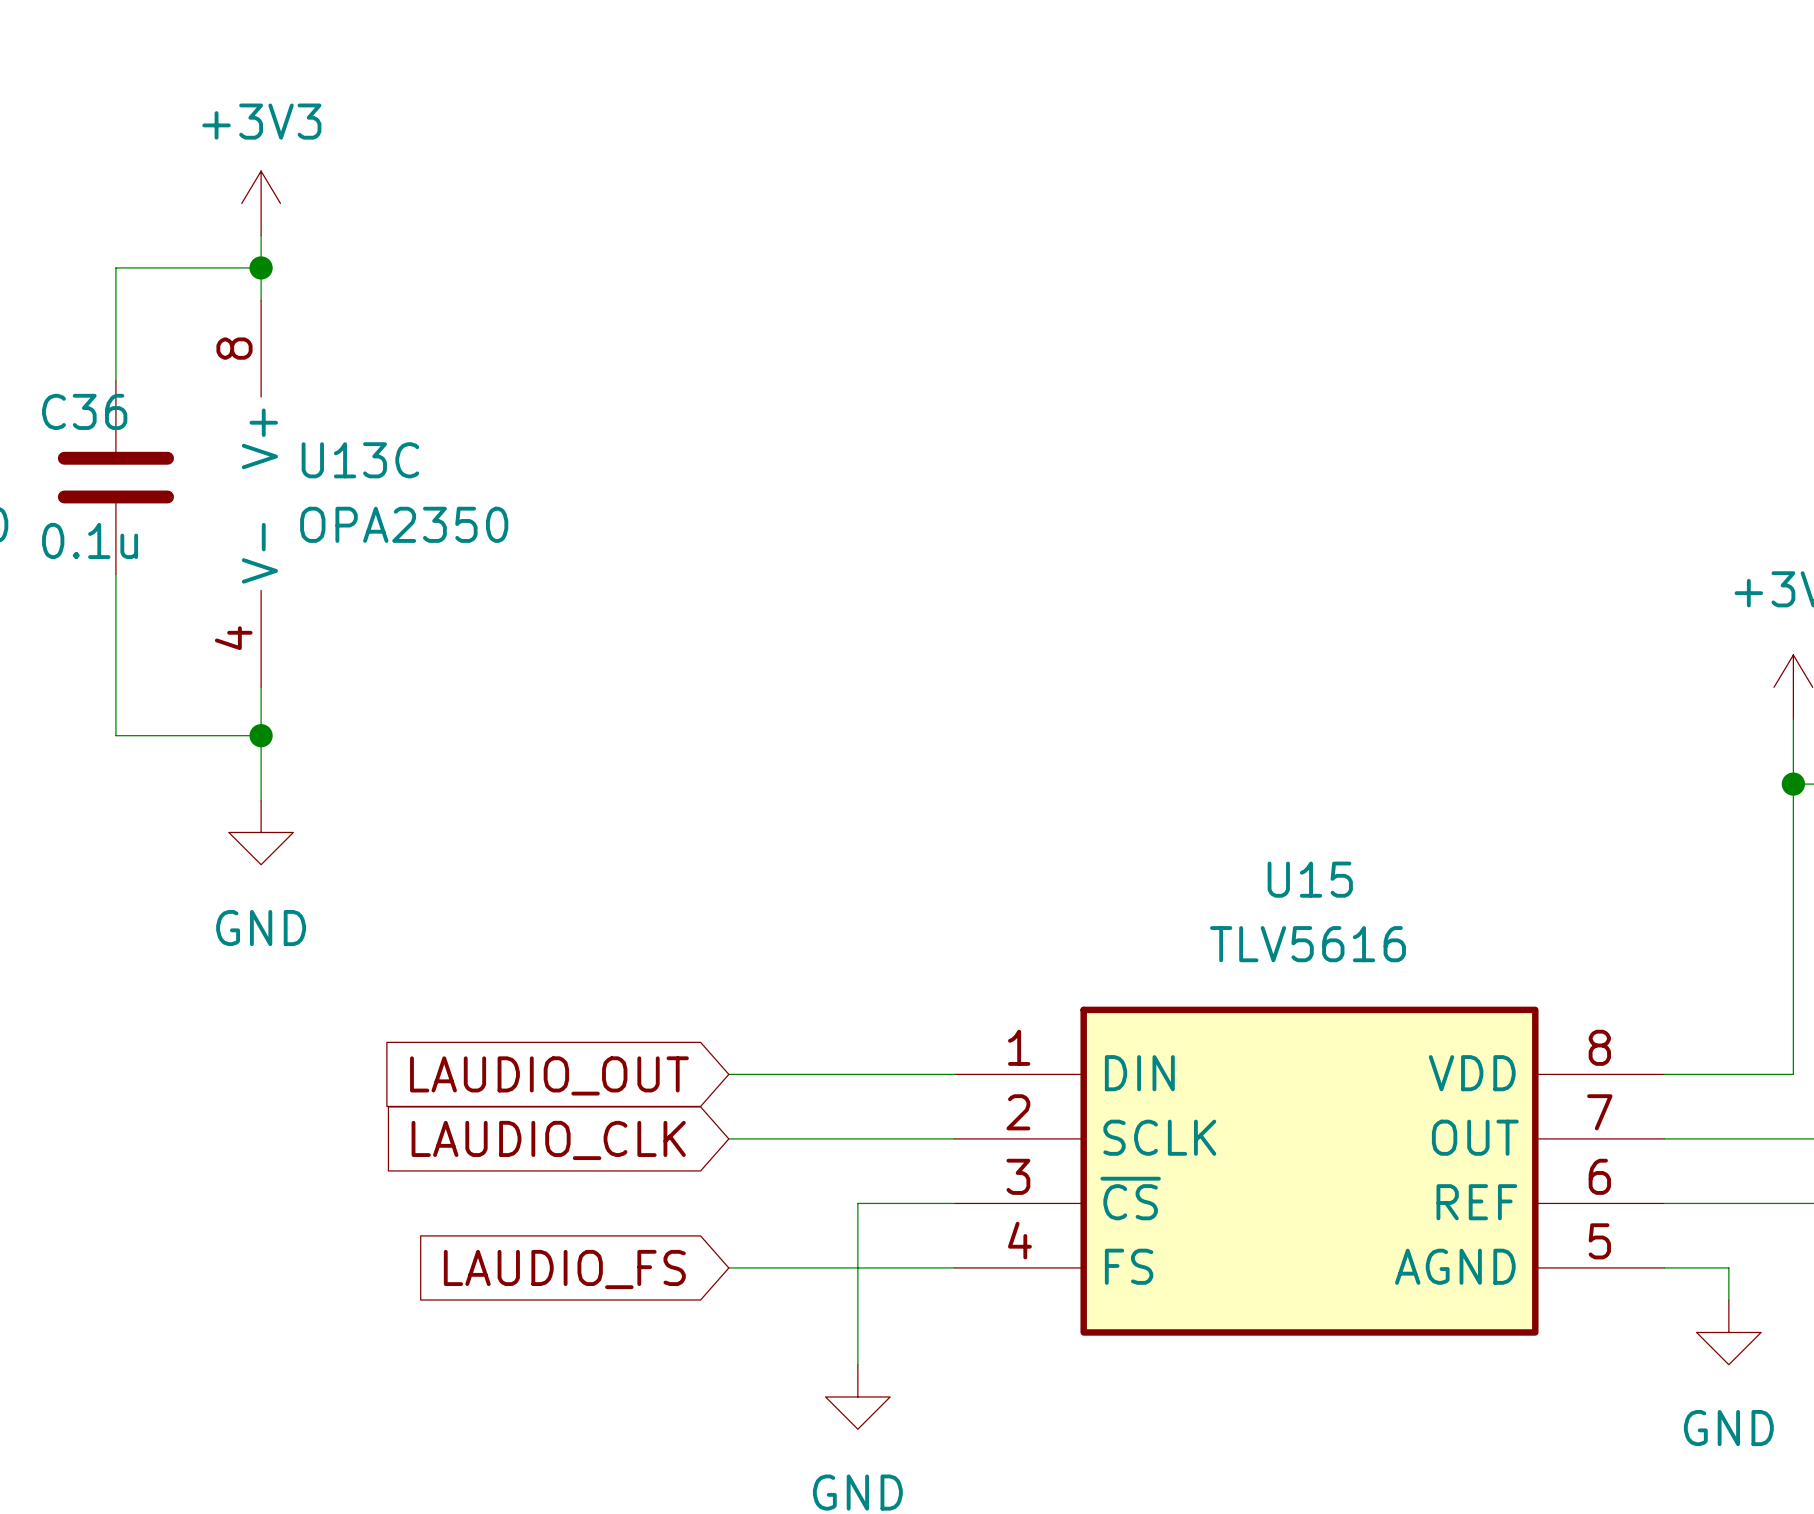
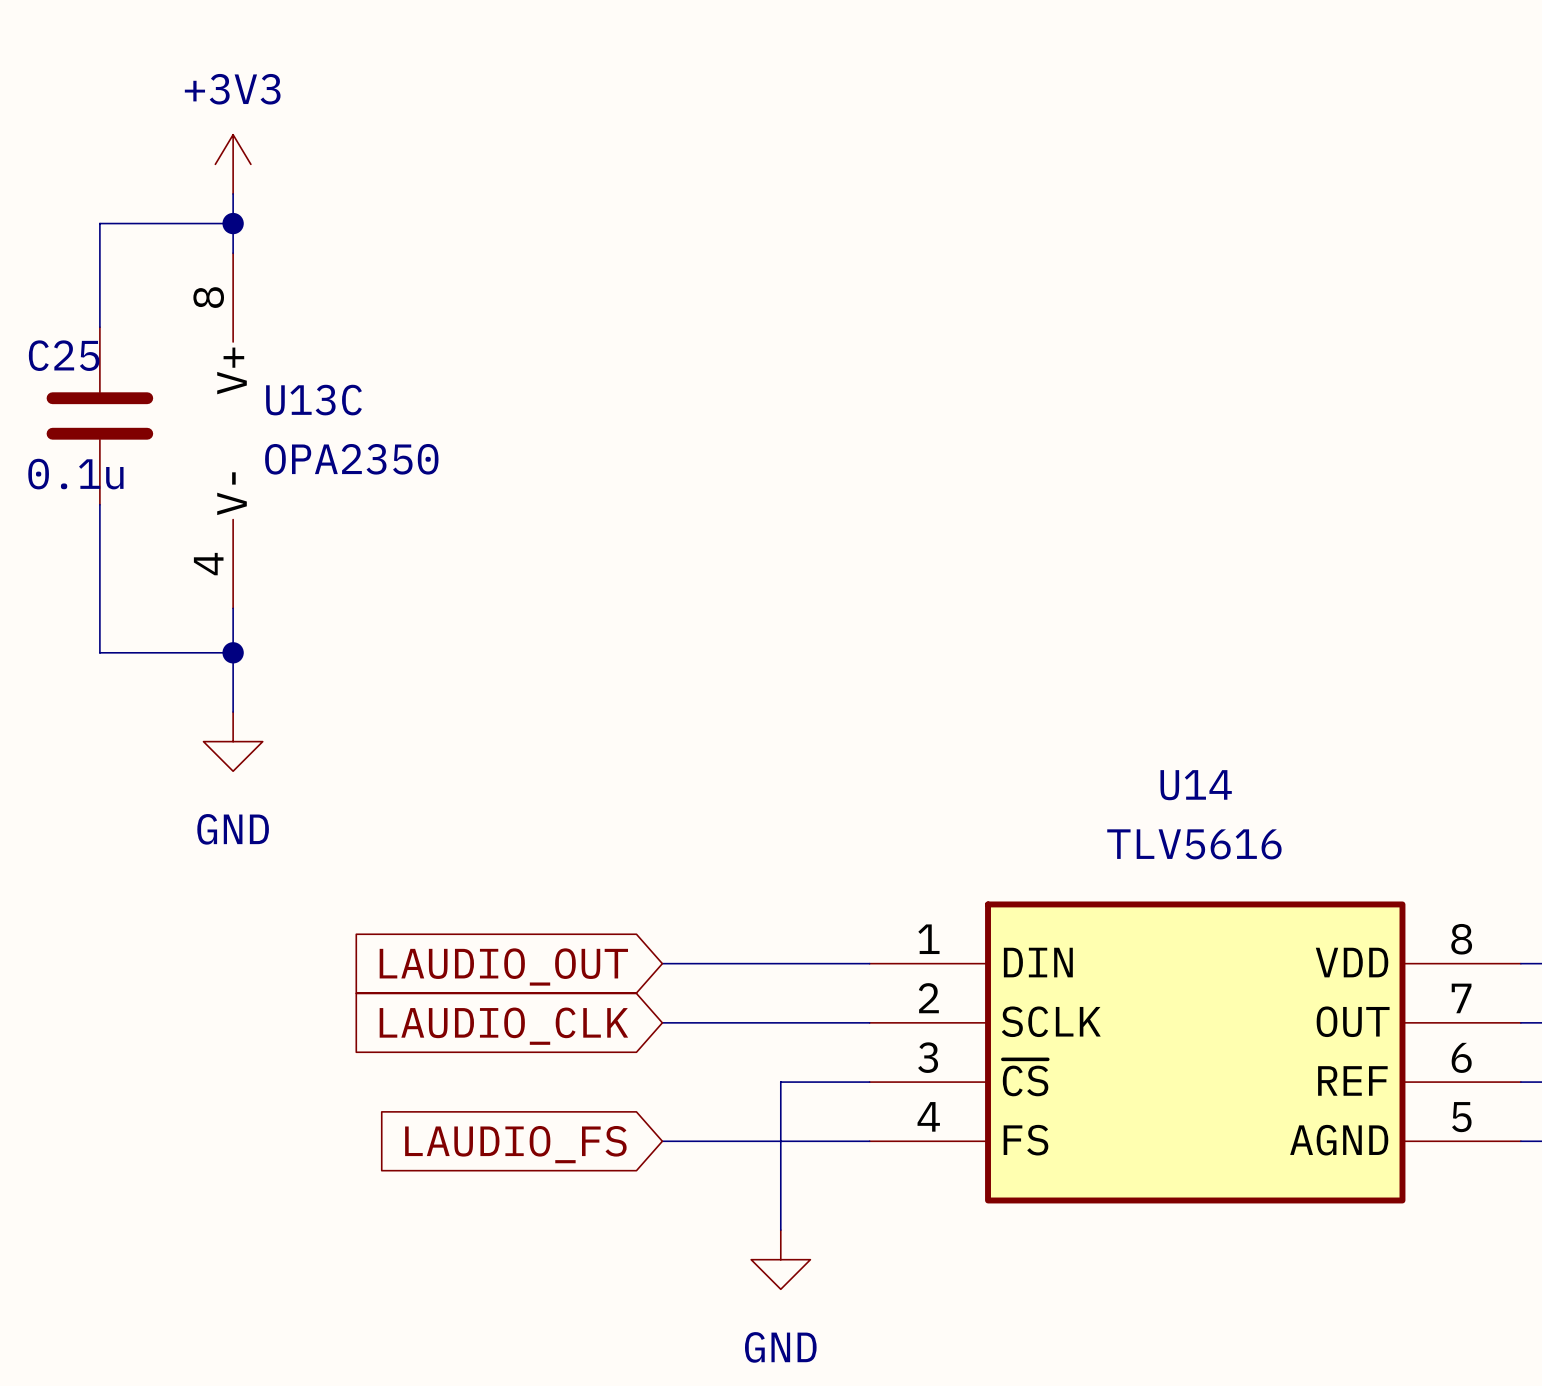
C36 name: C36 (84, 411) -> C25 (64, 355)
U15 name: U15 (1310, 879) -> U14 (1196, 785)

